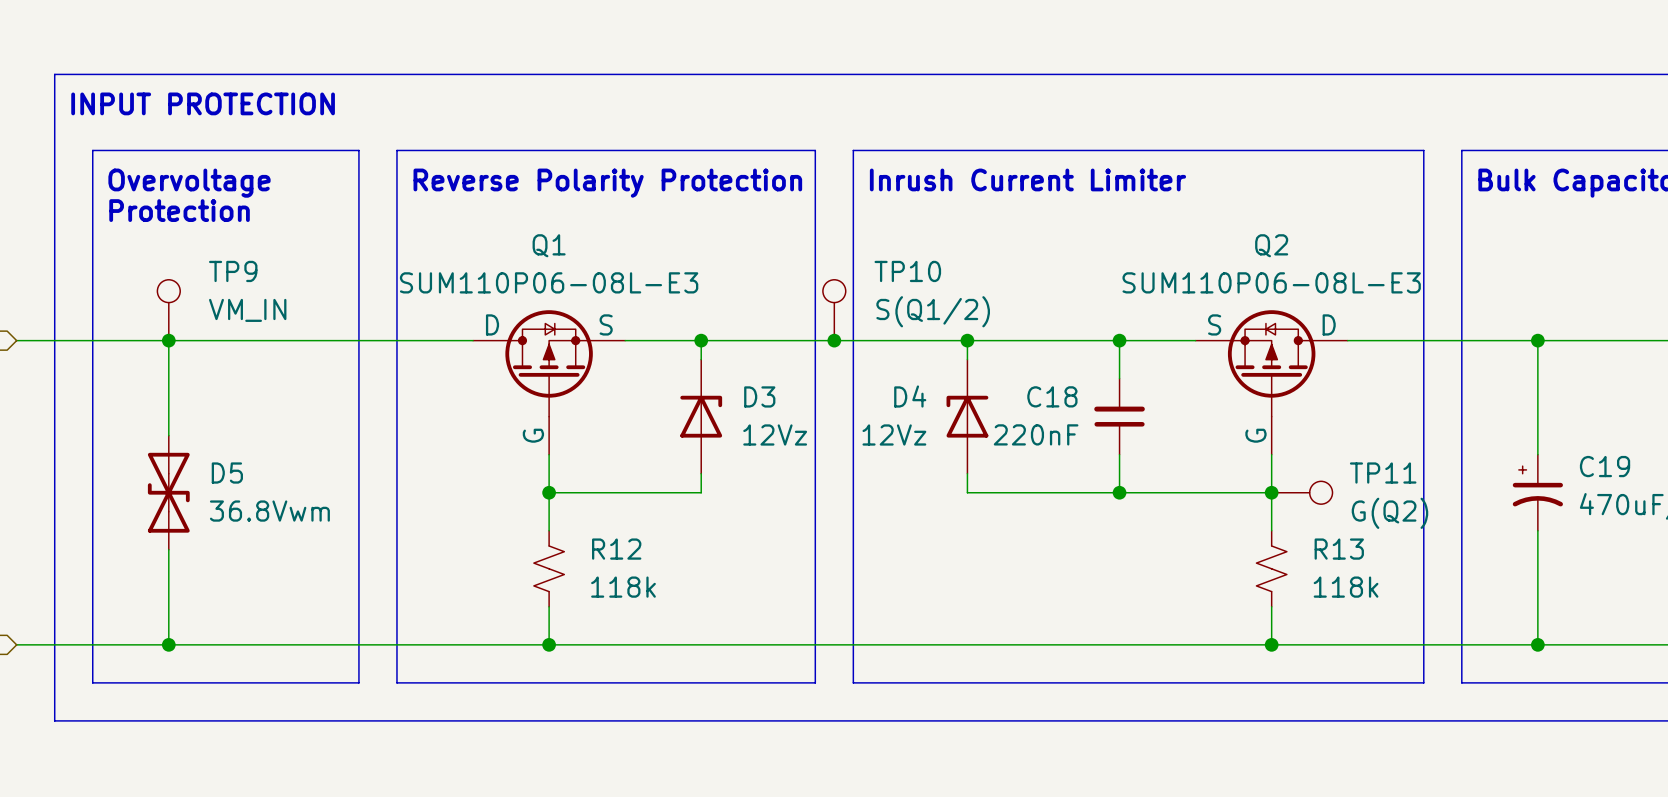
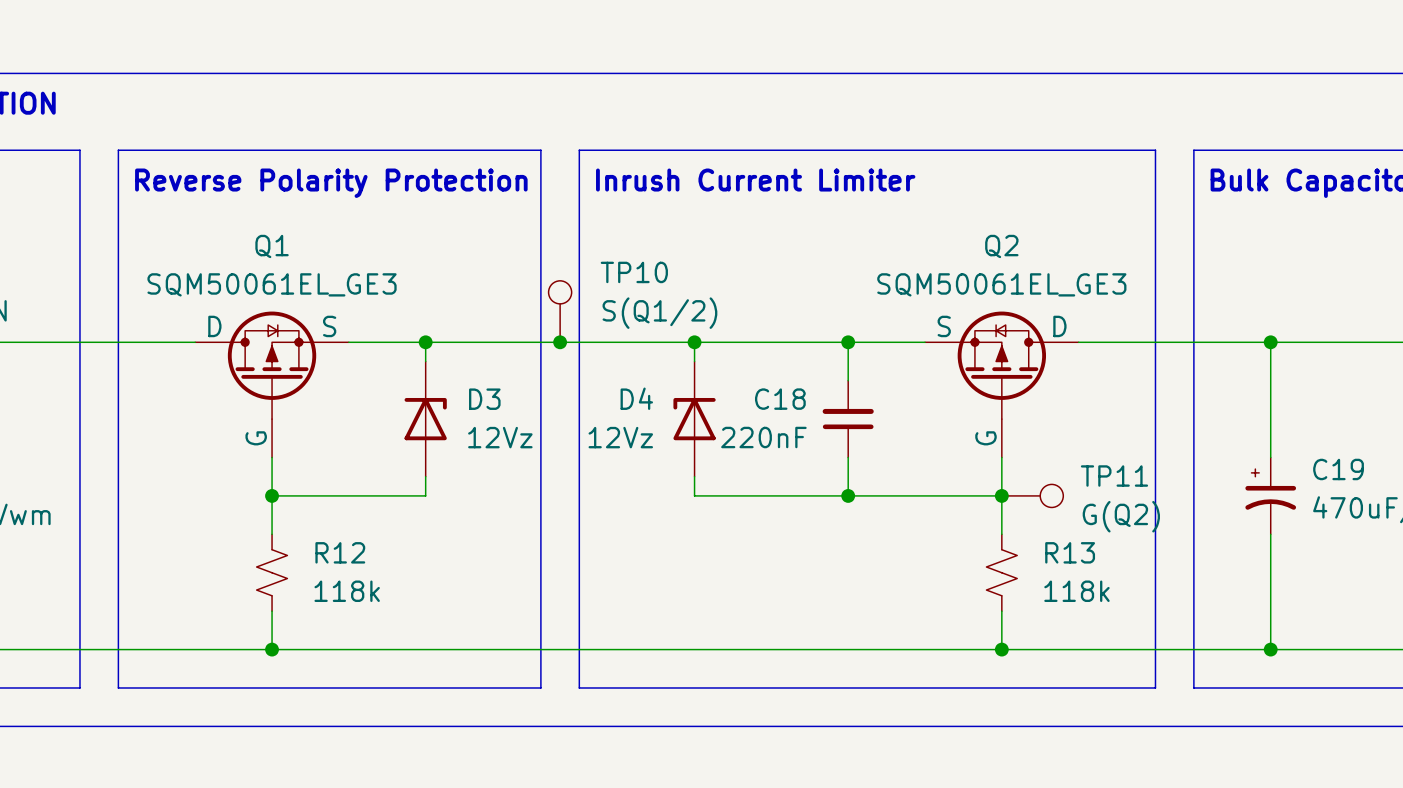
Q1 value: SUM110P06-08L-E3 (549, 282) -> SQM50061EL_GE3 (272, 284)
Q2 value: SUM110P06-08L-E3 (1271, 282) -> SQM50061EL_GE3 (1001, 284)

